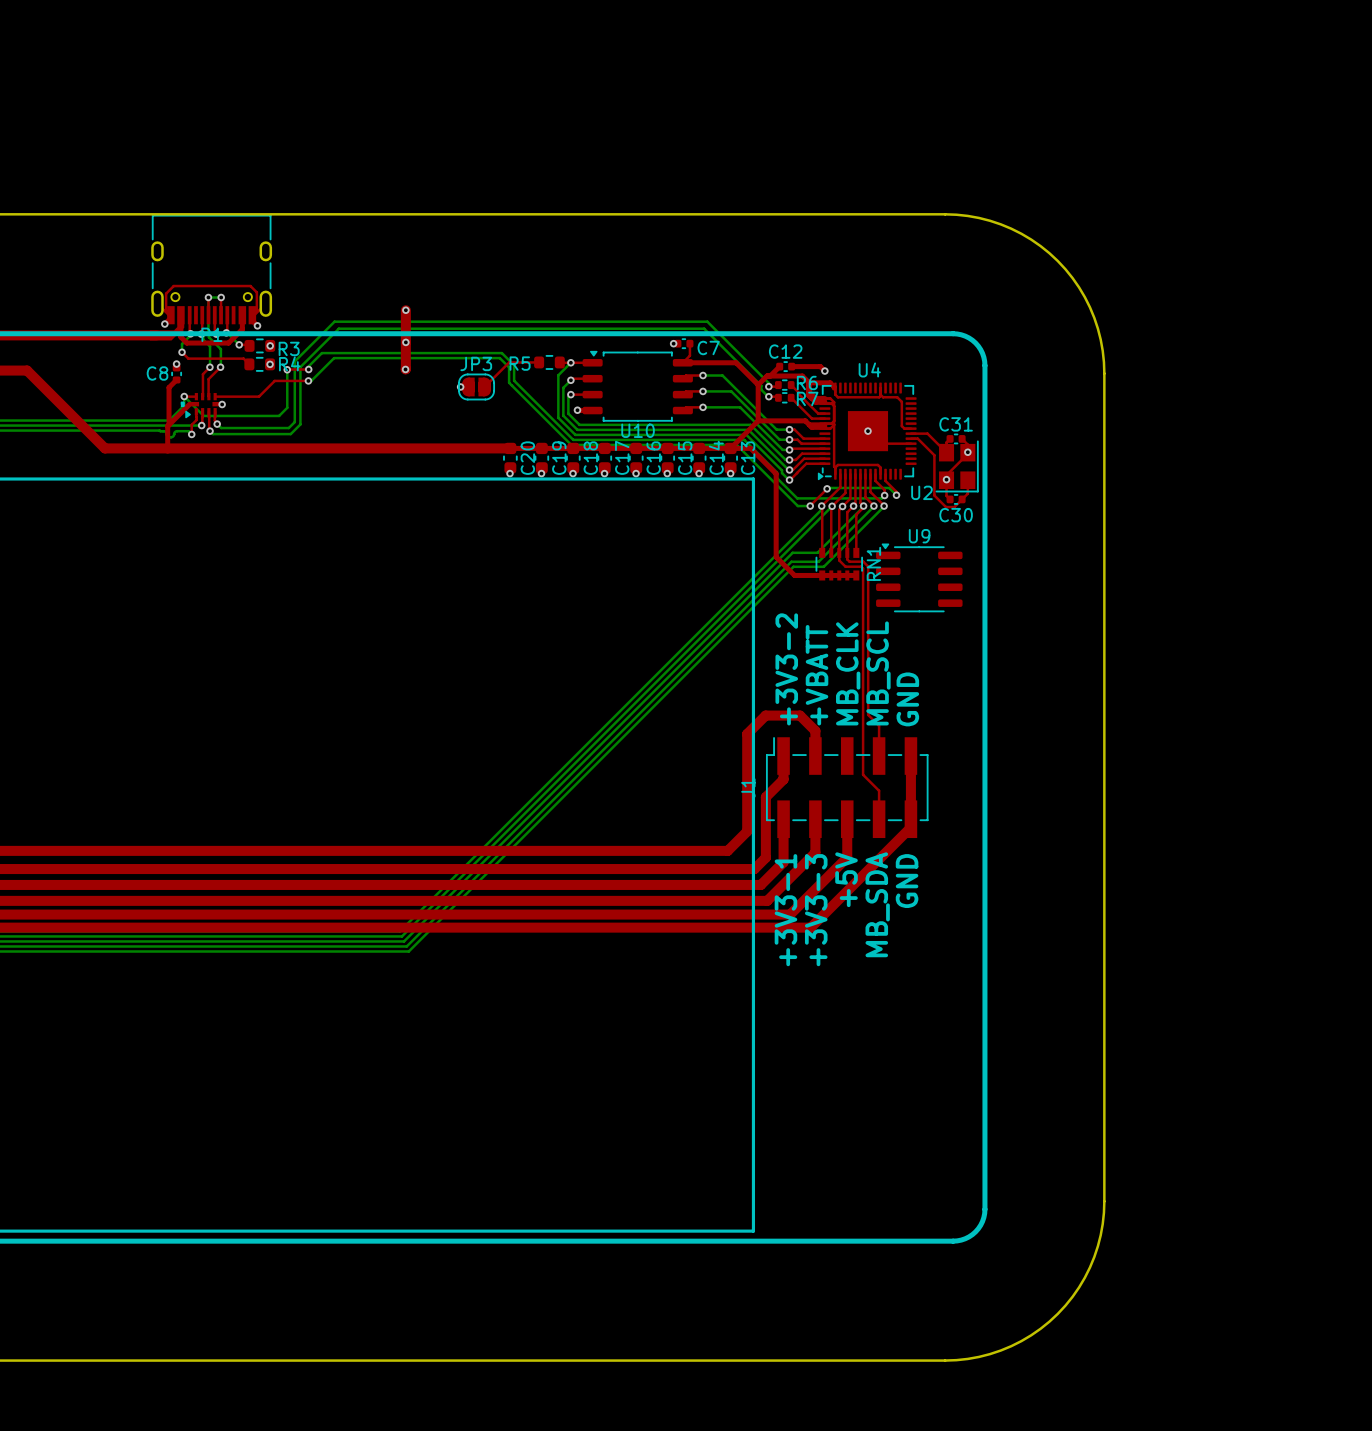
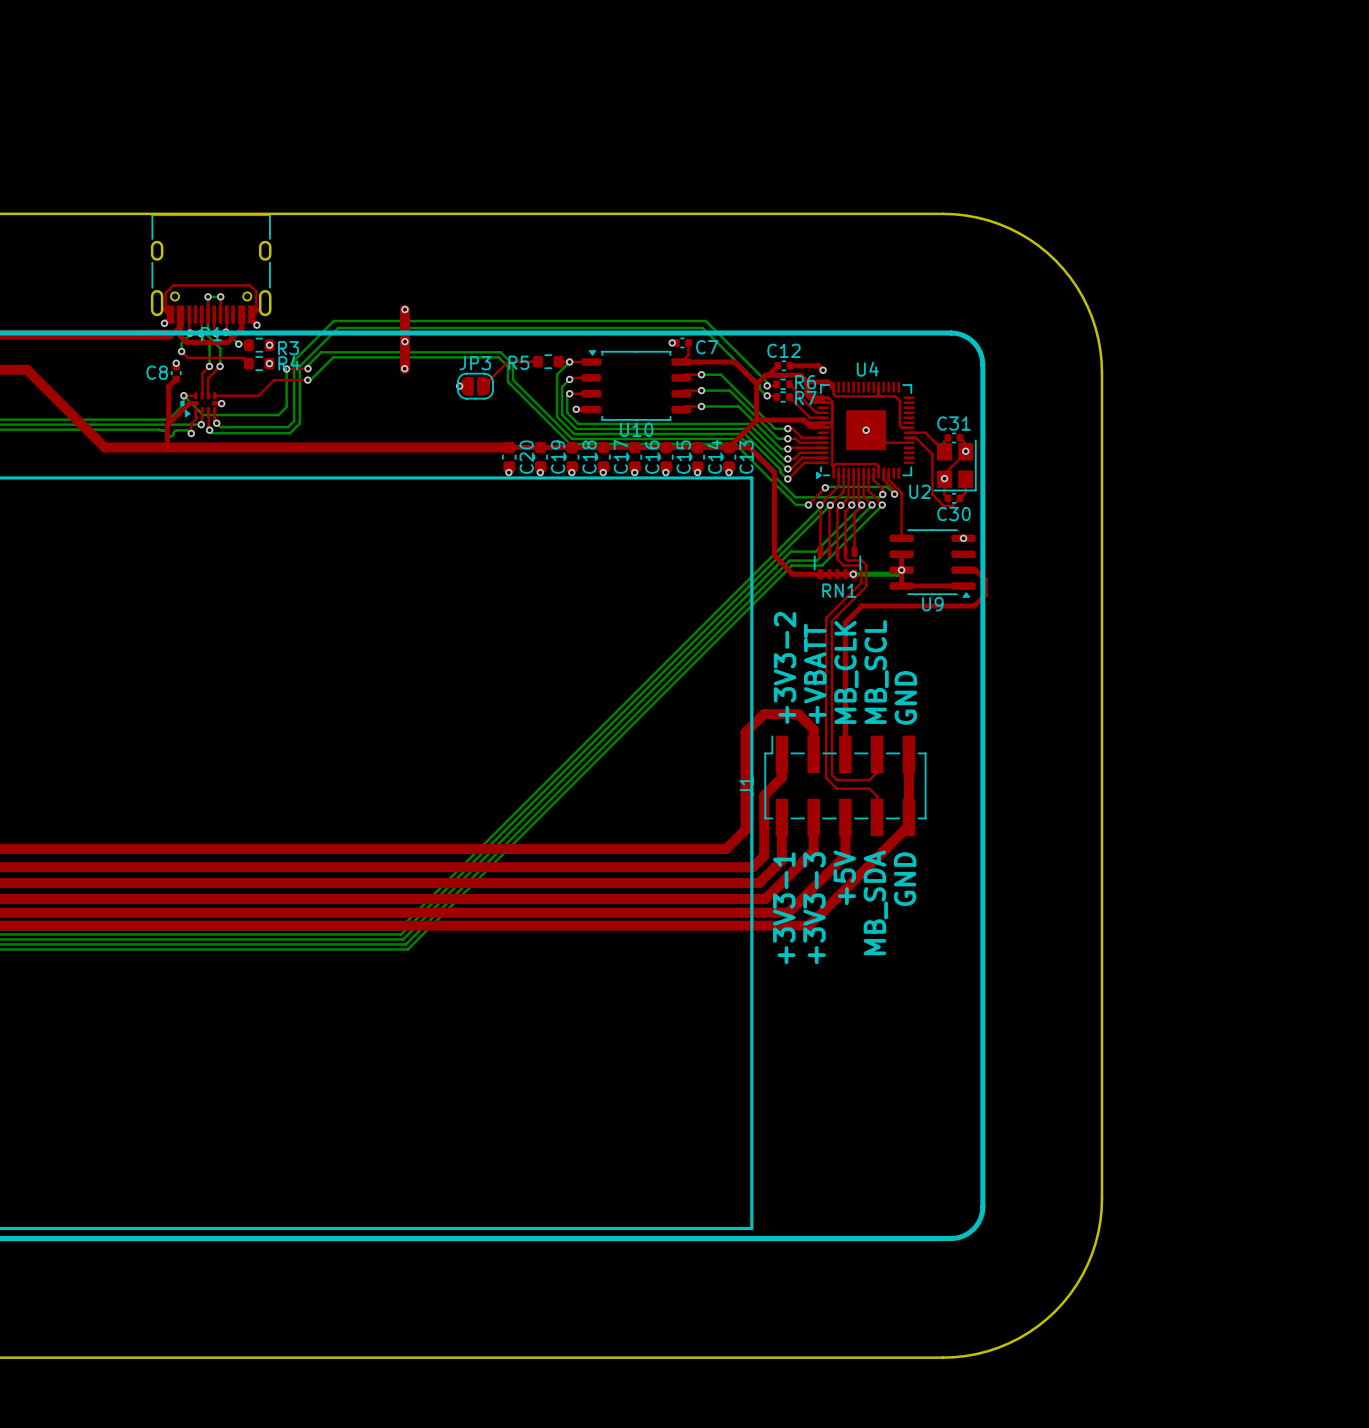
top track: none -> (888, 473) (888, 479) (901, 492) (901, 495)
top track: none -> (901, 495) (901, 538)
via: none -> (963, 538)
top track: none -> (901, 554) (901, 585) (963, 585)
RN1 name rotation: 0° (873, 563) -> 90° clockwise (839, 590)
bottom track: none -> (901, 570) (897, 574) (853, 574)
via: none -> (901, 570)
top track: none -> (963, 570) (975, 570) (985, 579) (985, 595) (974, 606) (861, 606) (845, 622) (845, 754)
via: none -> (853, 574)
U9 rotation: 0° (919, 577) -> 180° (932, 563)
top track: (863, 584) (863, 774) (879, 790) (879, 798) -> (861, 582) (826, 617) (826, 778) (836, 788) (869, 788) (877, 796)
top track: (868, 587) (868, 714) (879, 725) (879, 756) -> (866, 586) (832, 620) (832, 775) (837, 780) (869, 780) (877, 772) (877, 754)

